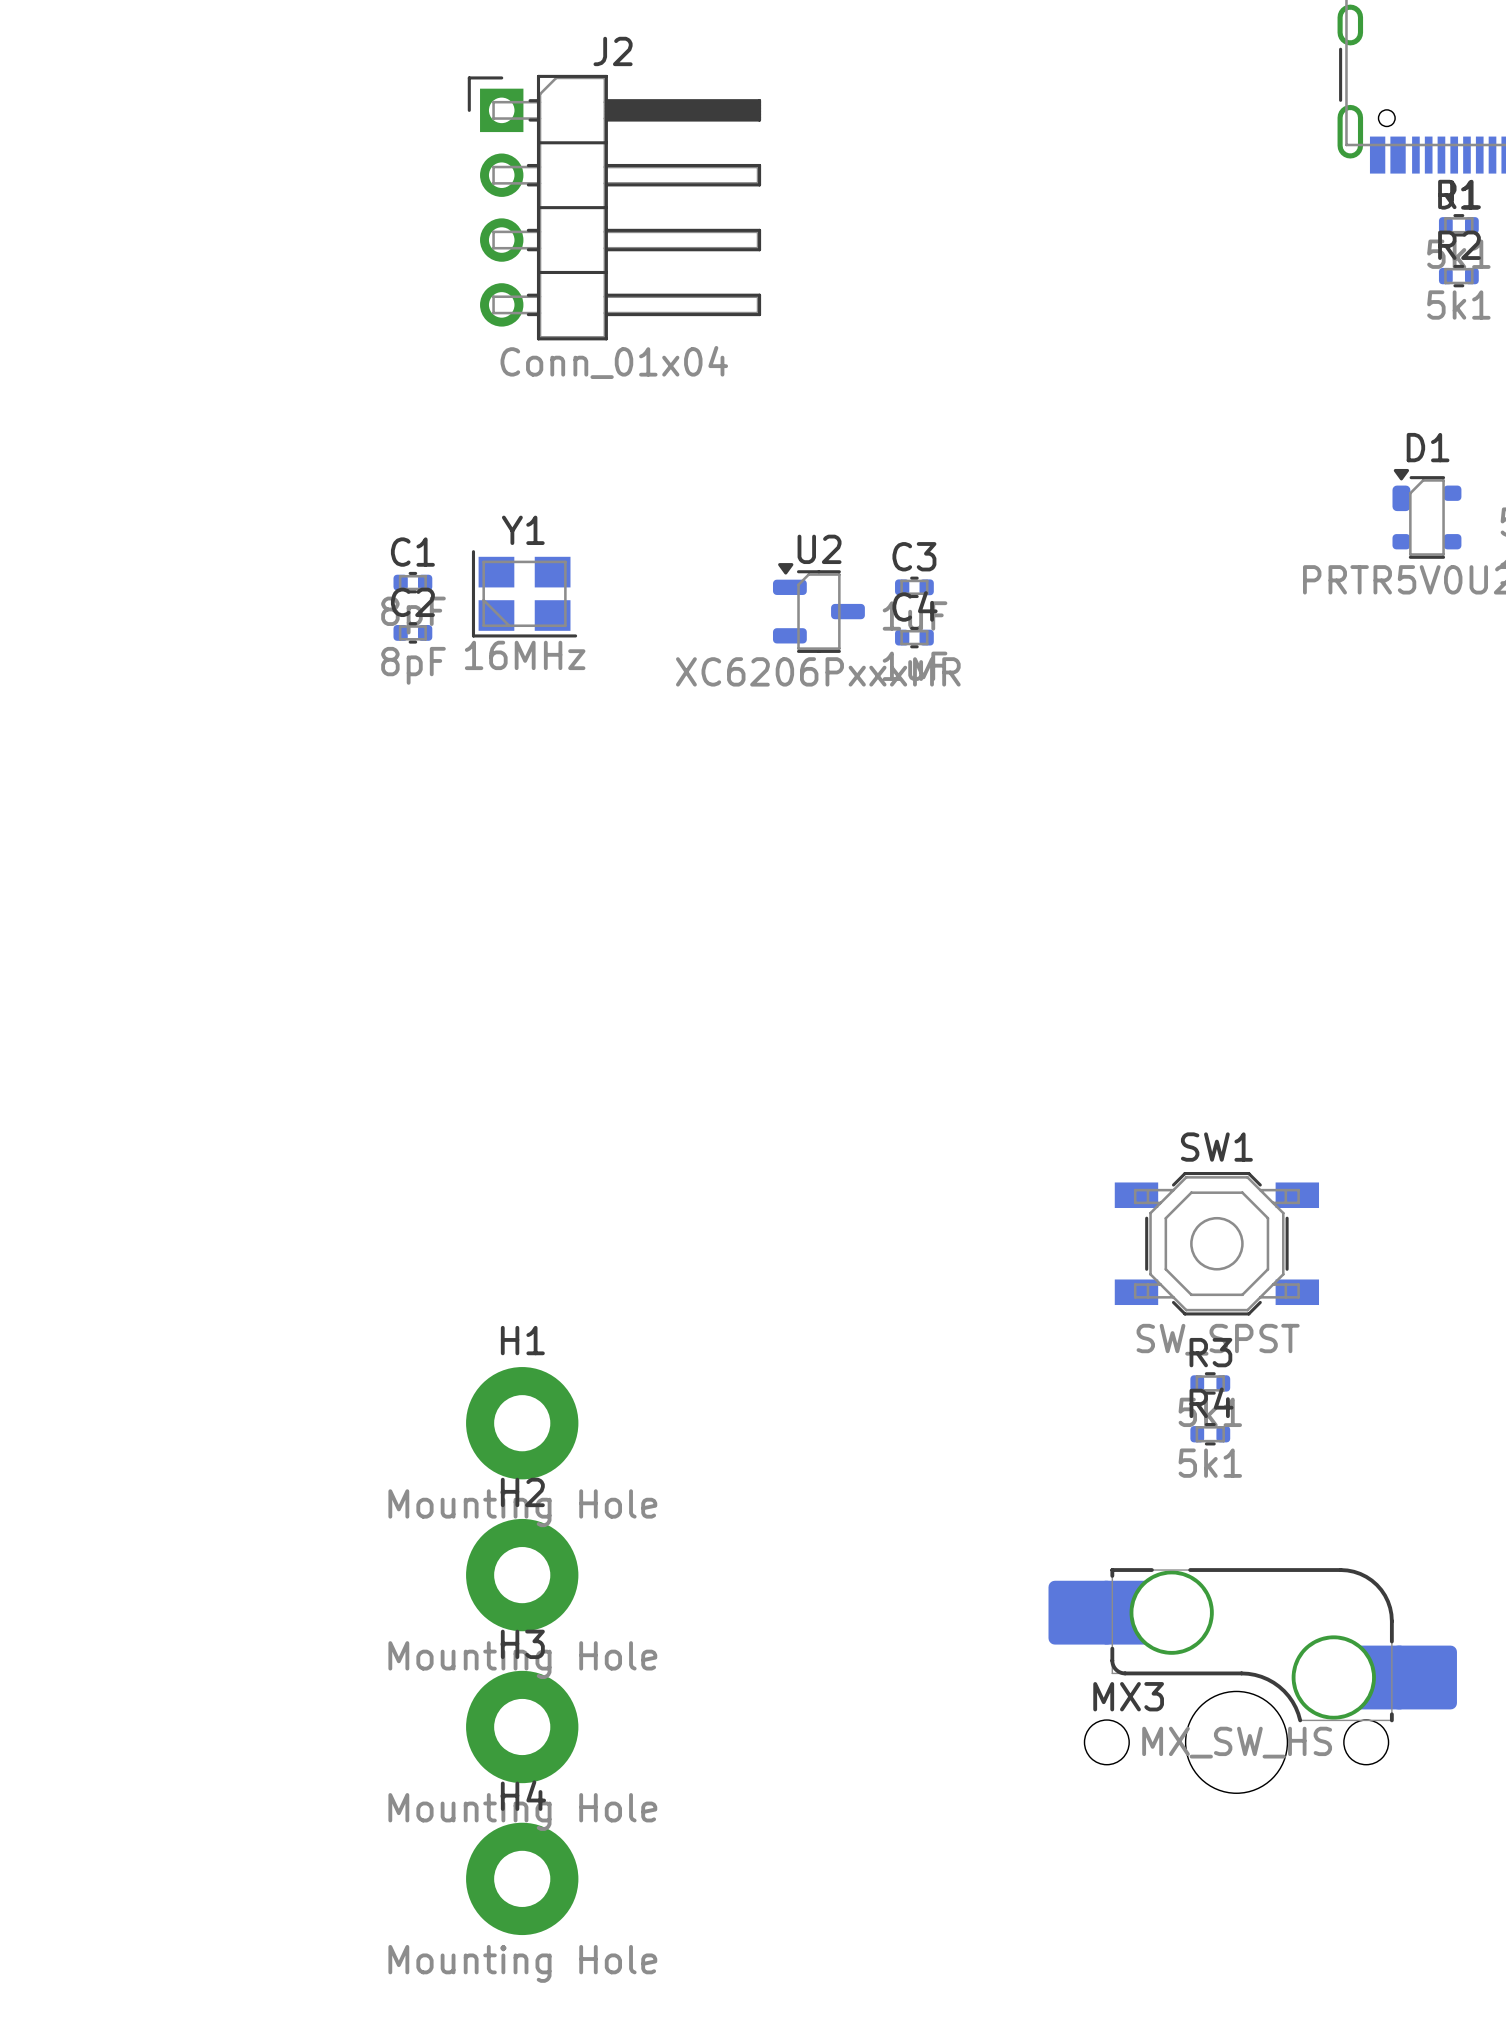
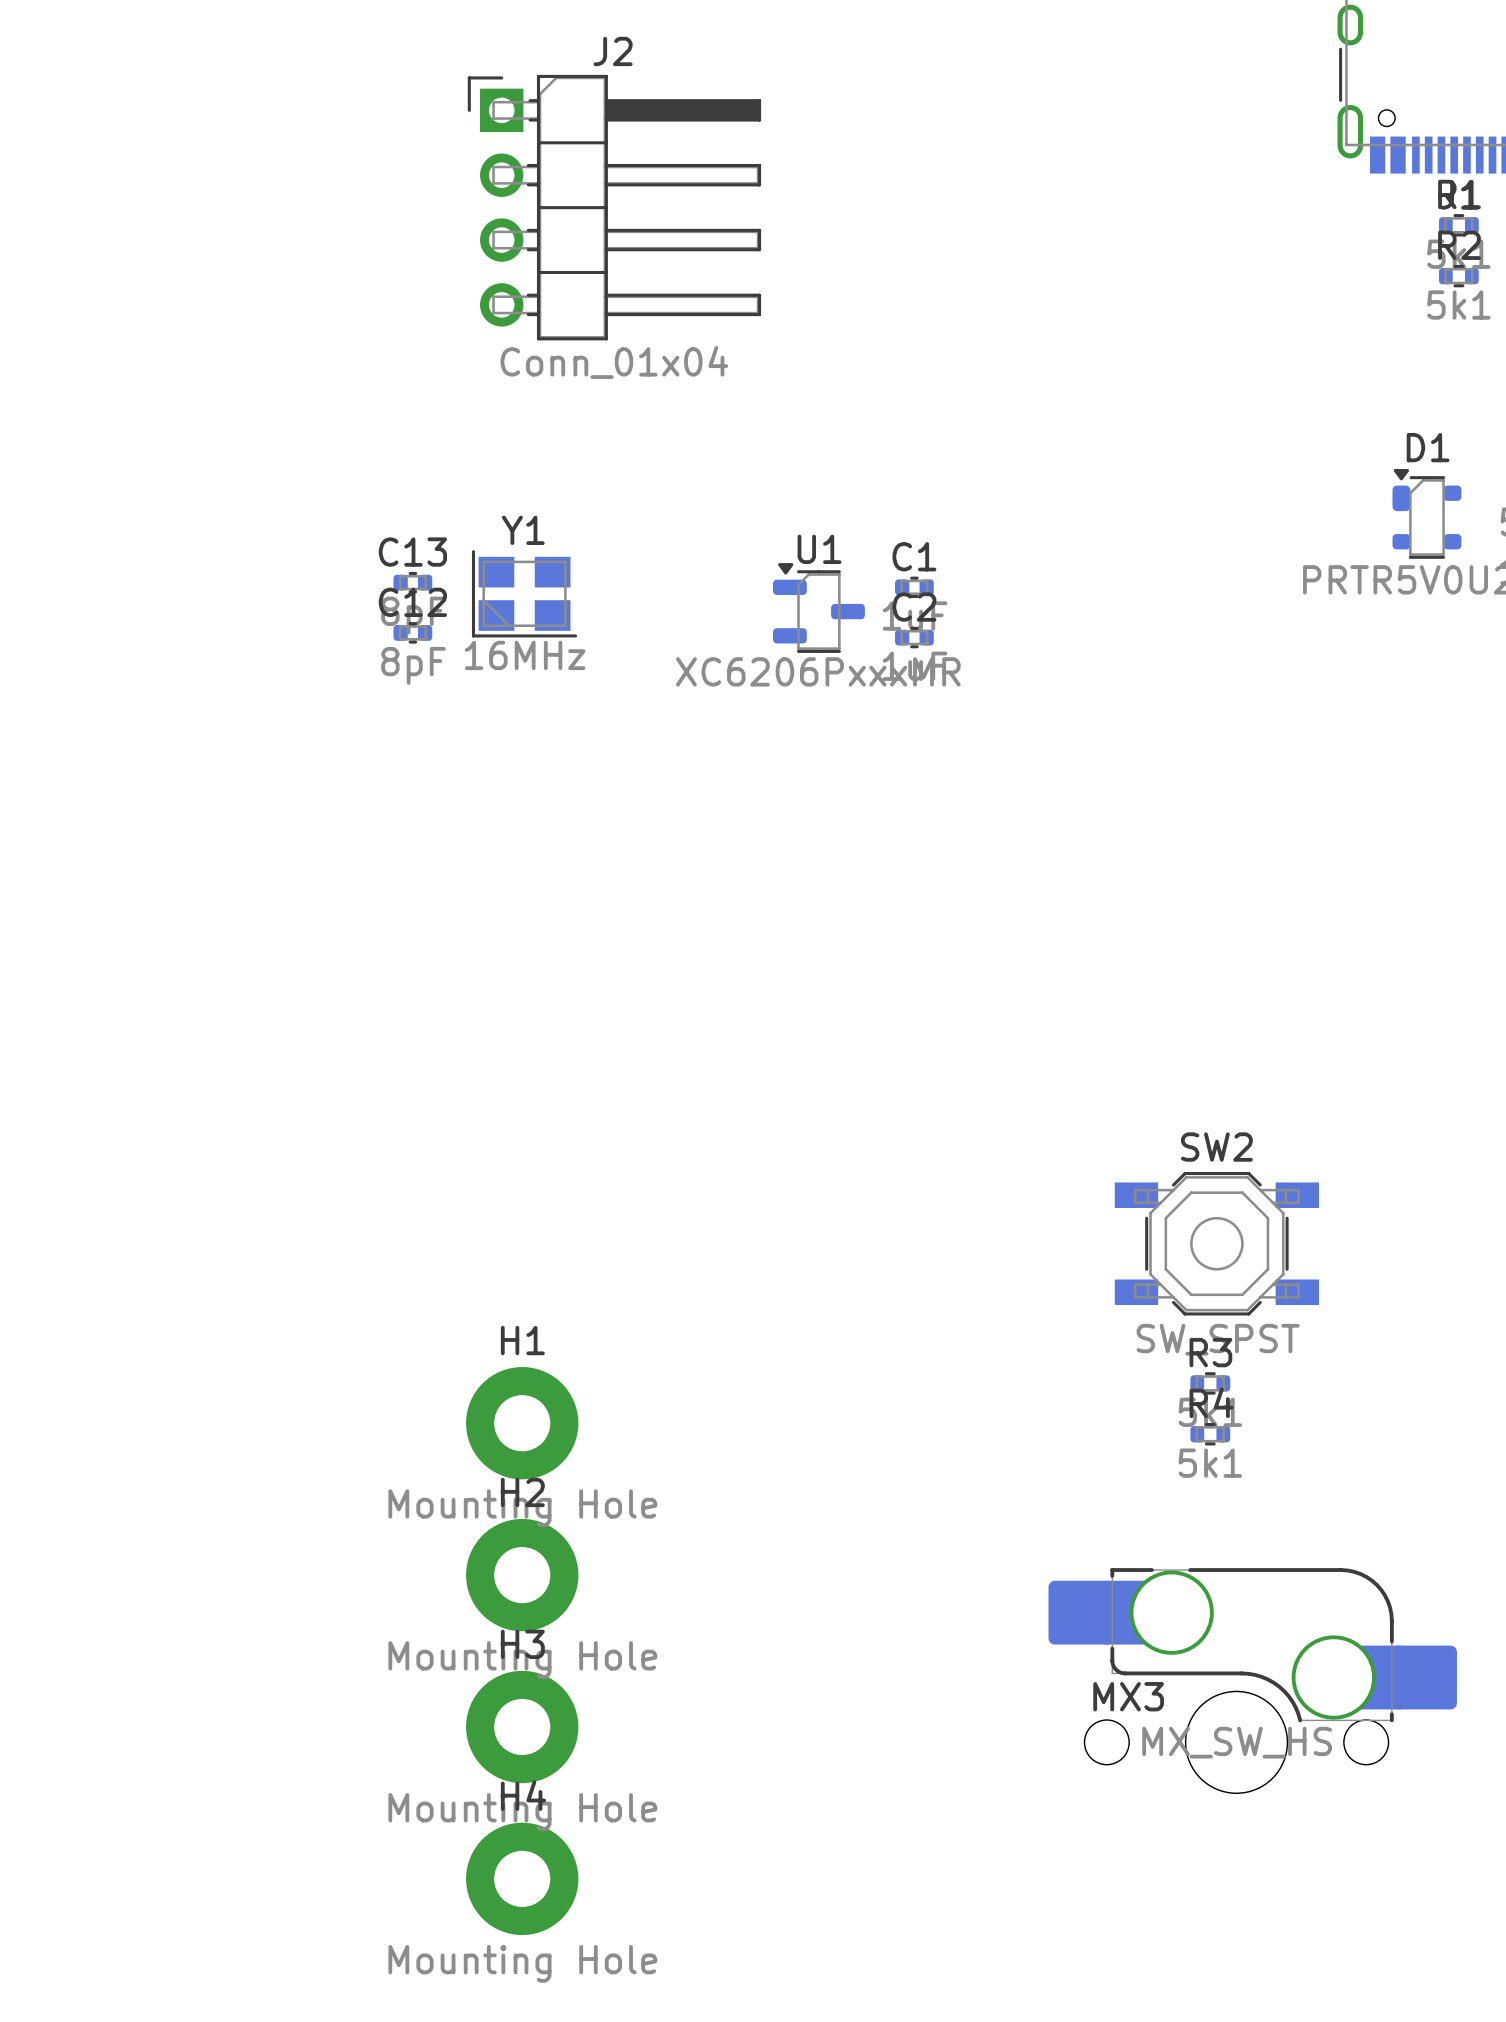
U2 name: U2 (819, 549) -> U1 (819, 549)
C1 name: C1 (412, 552) -> C13 (412, 552)
C3 name: C3 (914, 556) -> C1 (914, 556)
C2 name: C2 (412, 602) -> C12 (412, 602)
C4 name: C4 (915, 606) -> C2 (914, 607)
SW1 name: SW1 (1216, 1147) -> SW2 (1216, 1147)

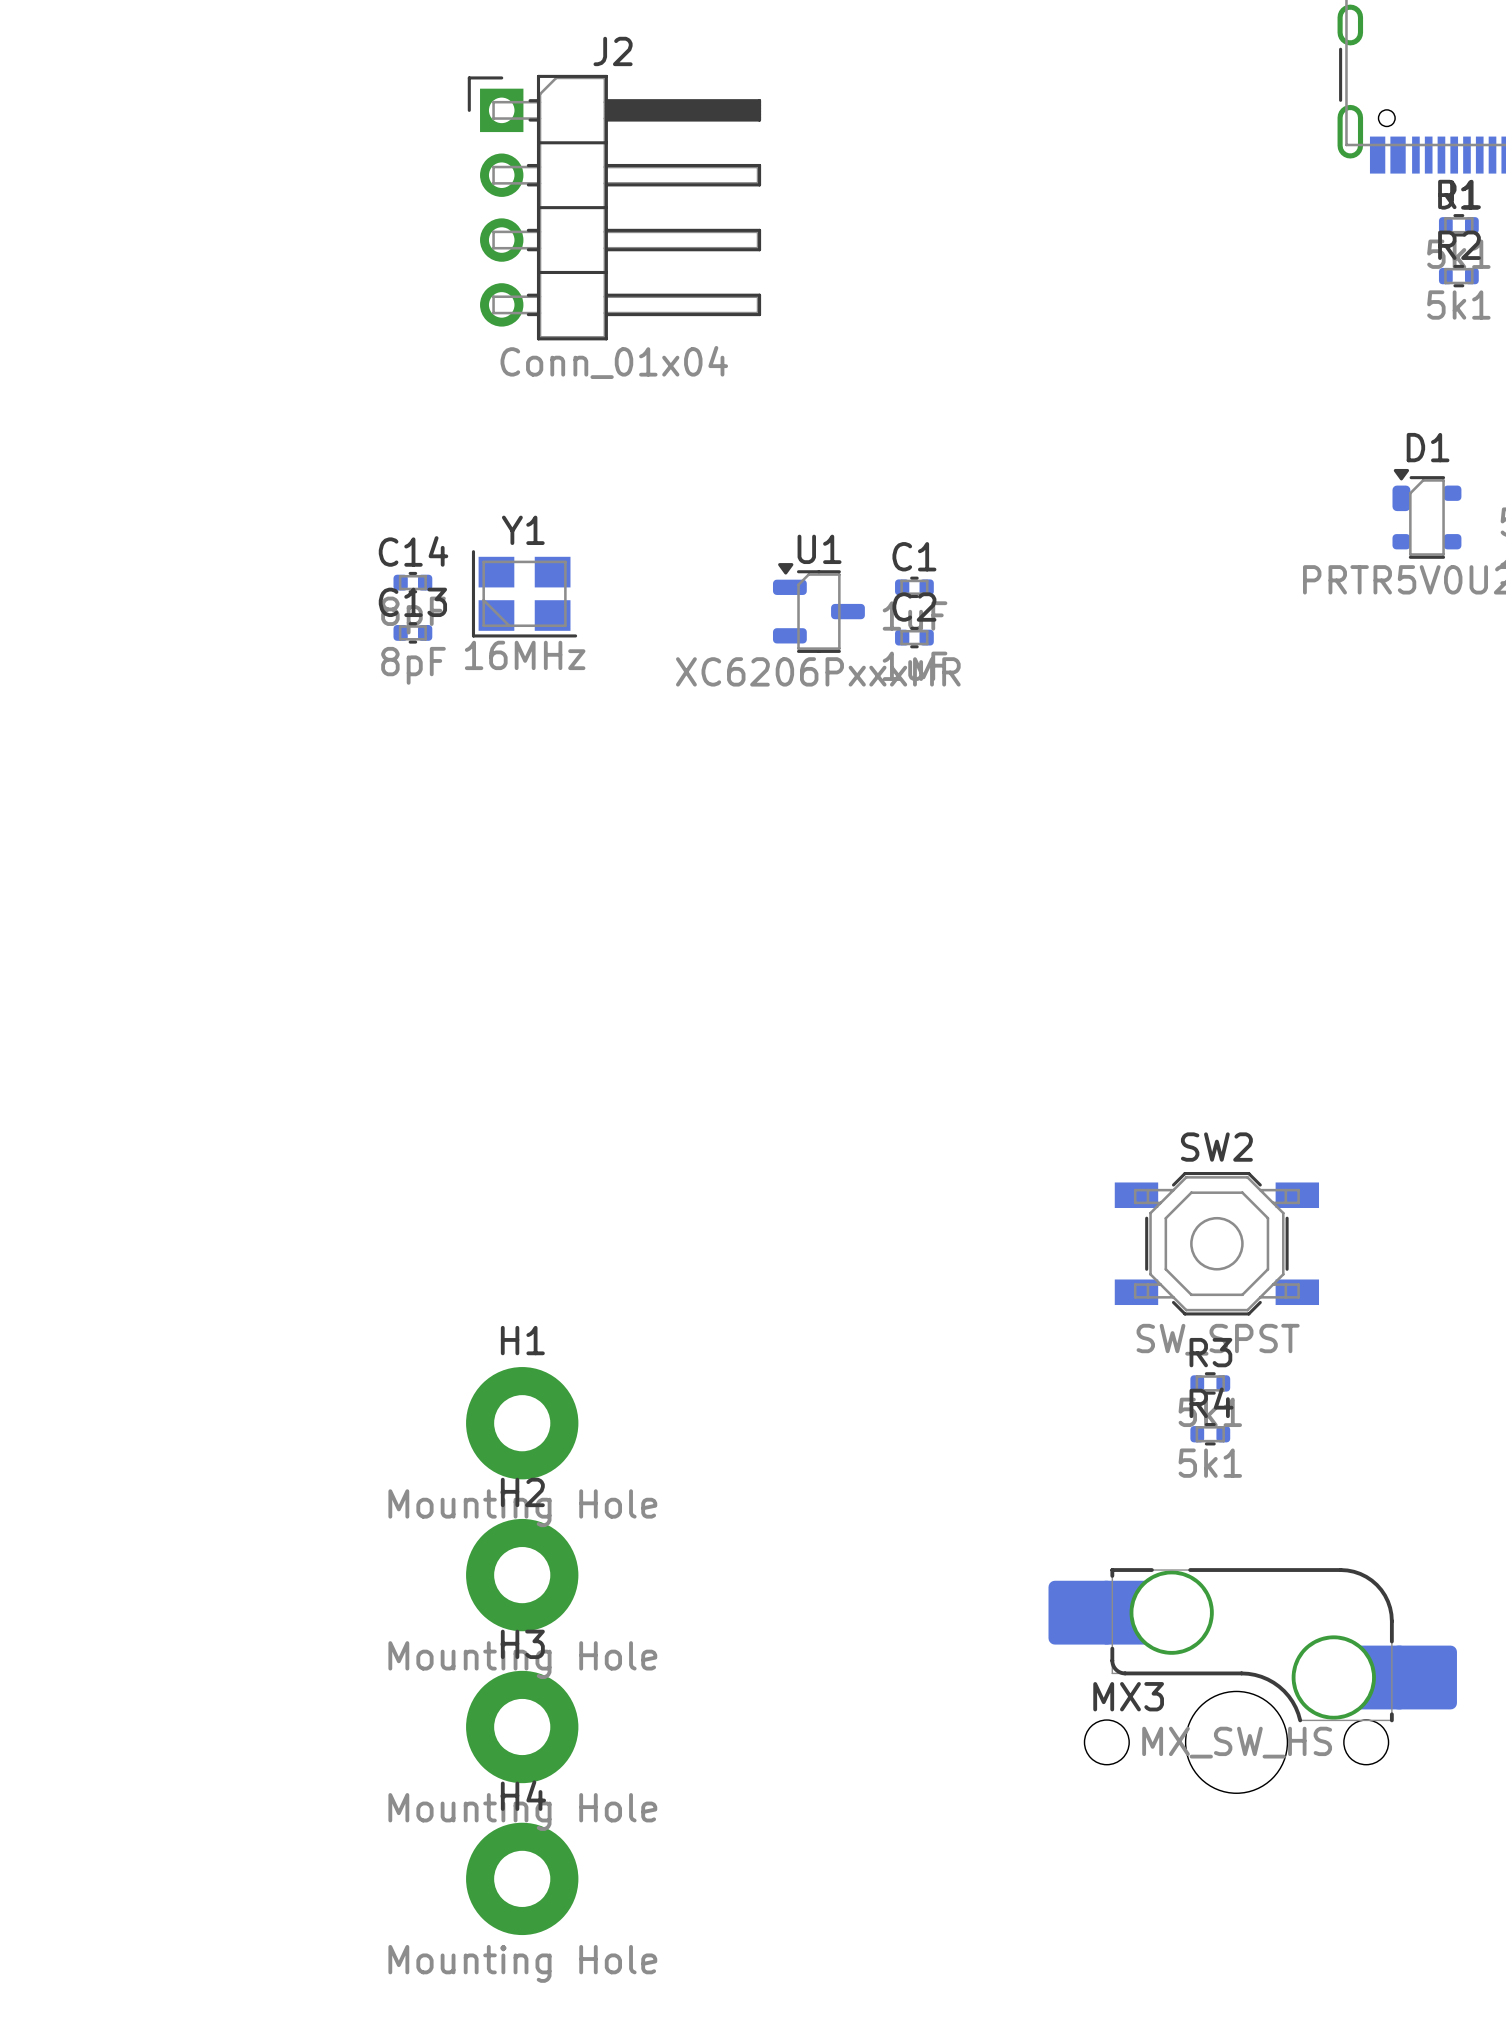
C13 name: C13 (412, 552) -> C14 (413, 551)
C12 name: C12 (412, 602) -> C13 (412, 602)

